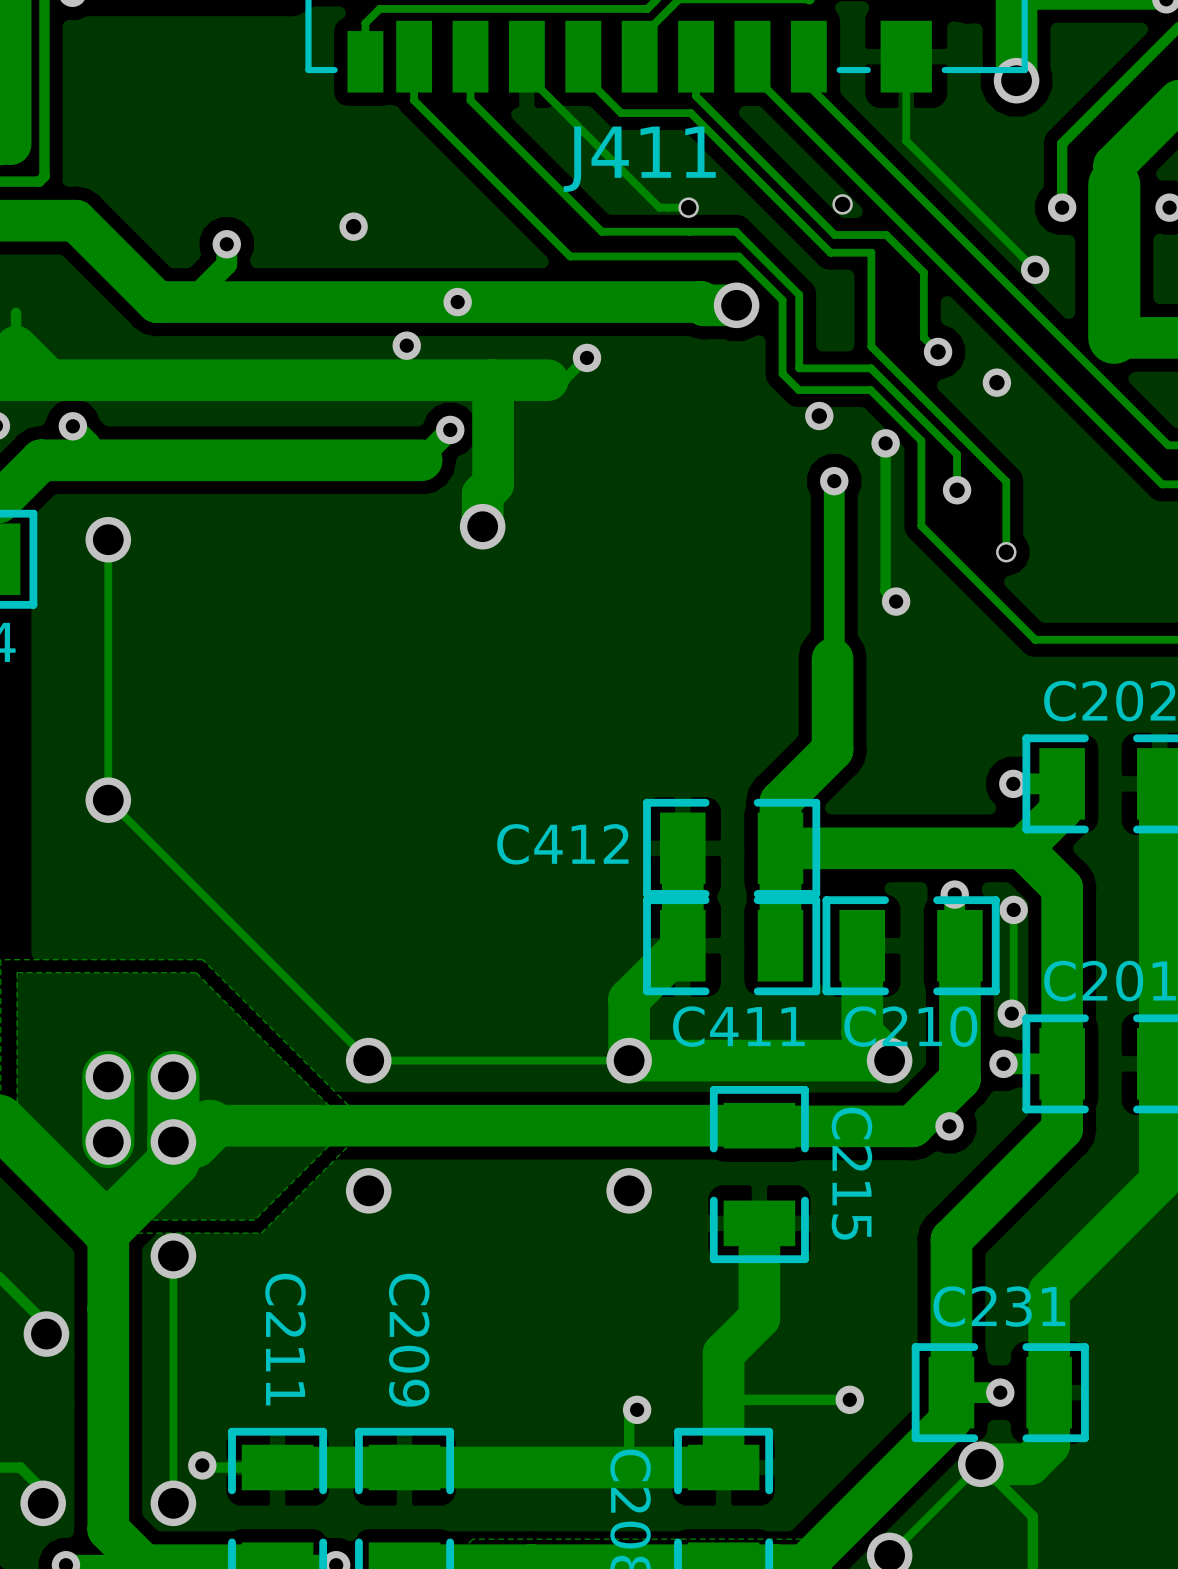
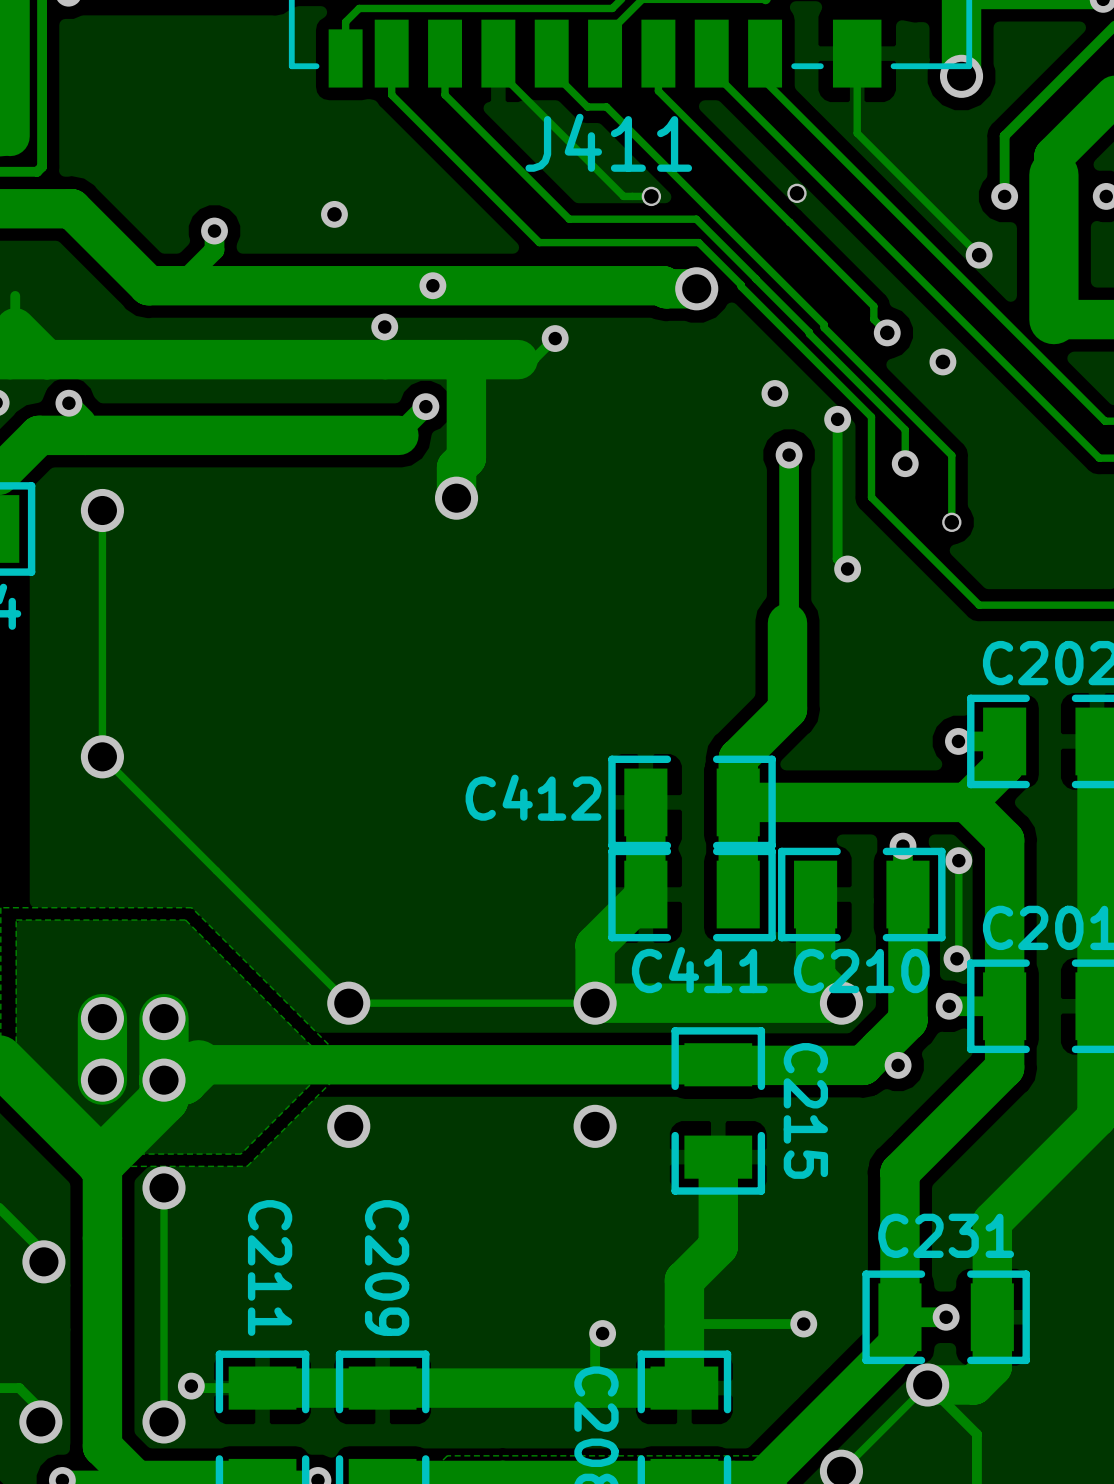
track: (641, 113) (690, 113) (830, 252) (871, 252) (871, 343) -> (606, 107) (824, 324)
track: (835, 235) (886, 235) (923, 272) (923, 323) -> (789, 222) (873, 306)
track: (799, 295) (799, 368) (871, 368) -> (755, 279) (823, 348)
track: (782, 300) (782, 373) (798, 390) (870, 390) -> (740, 283) (823, 368)

